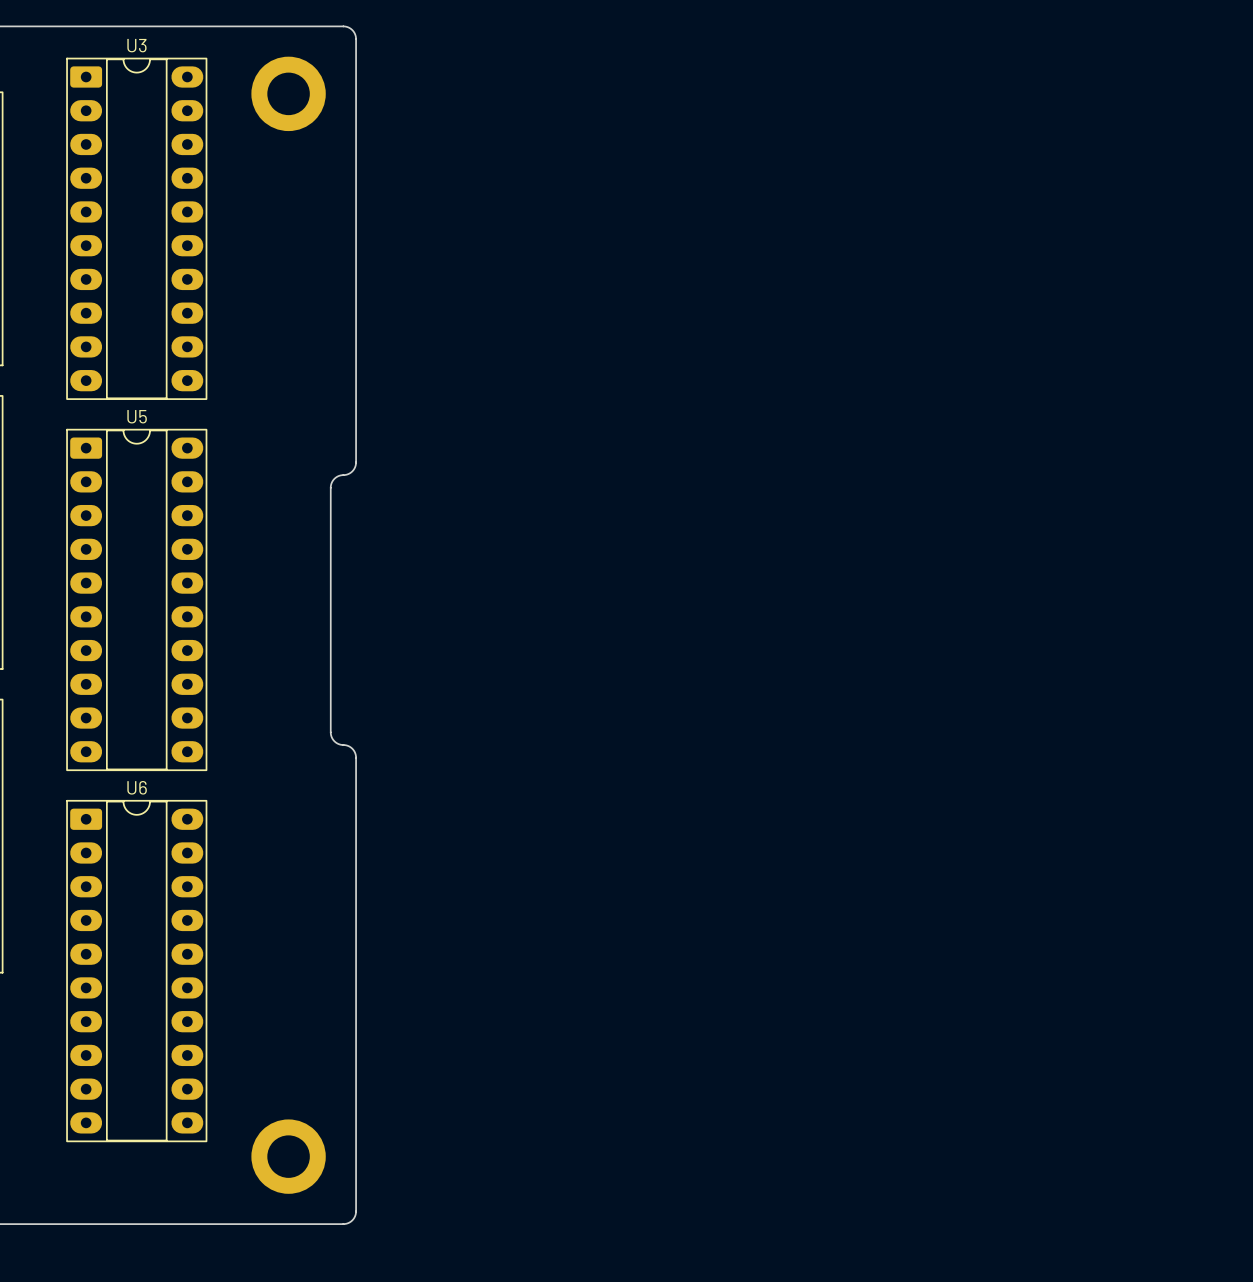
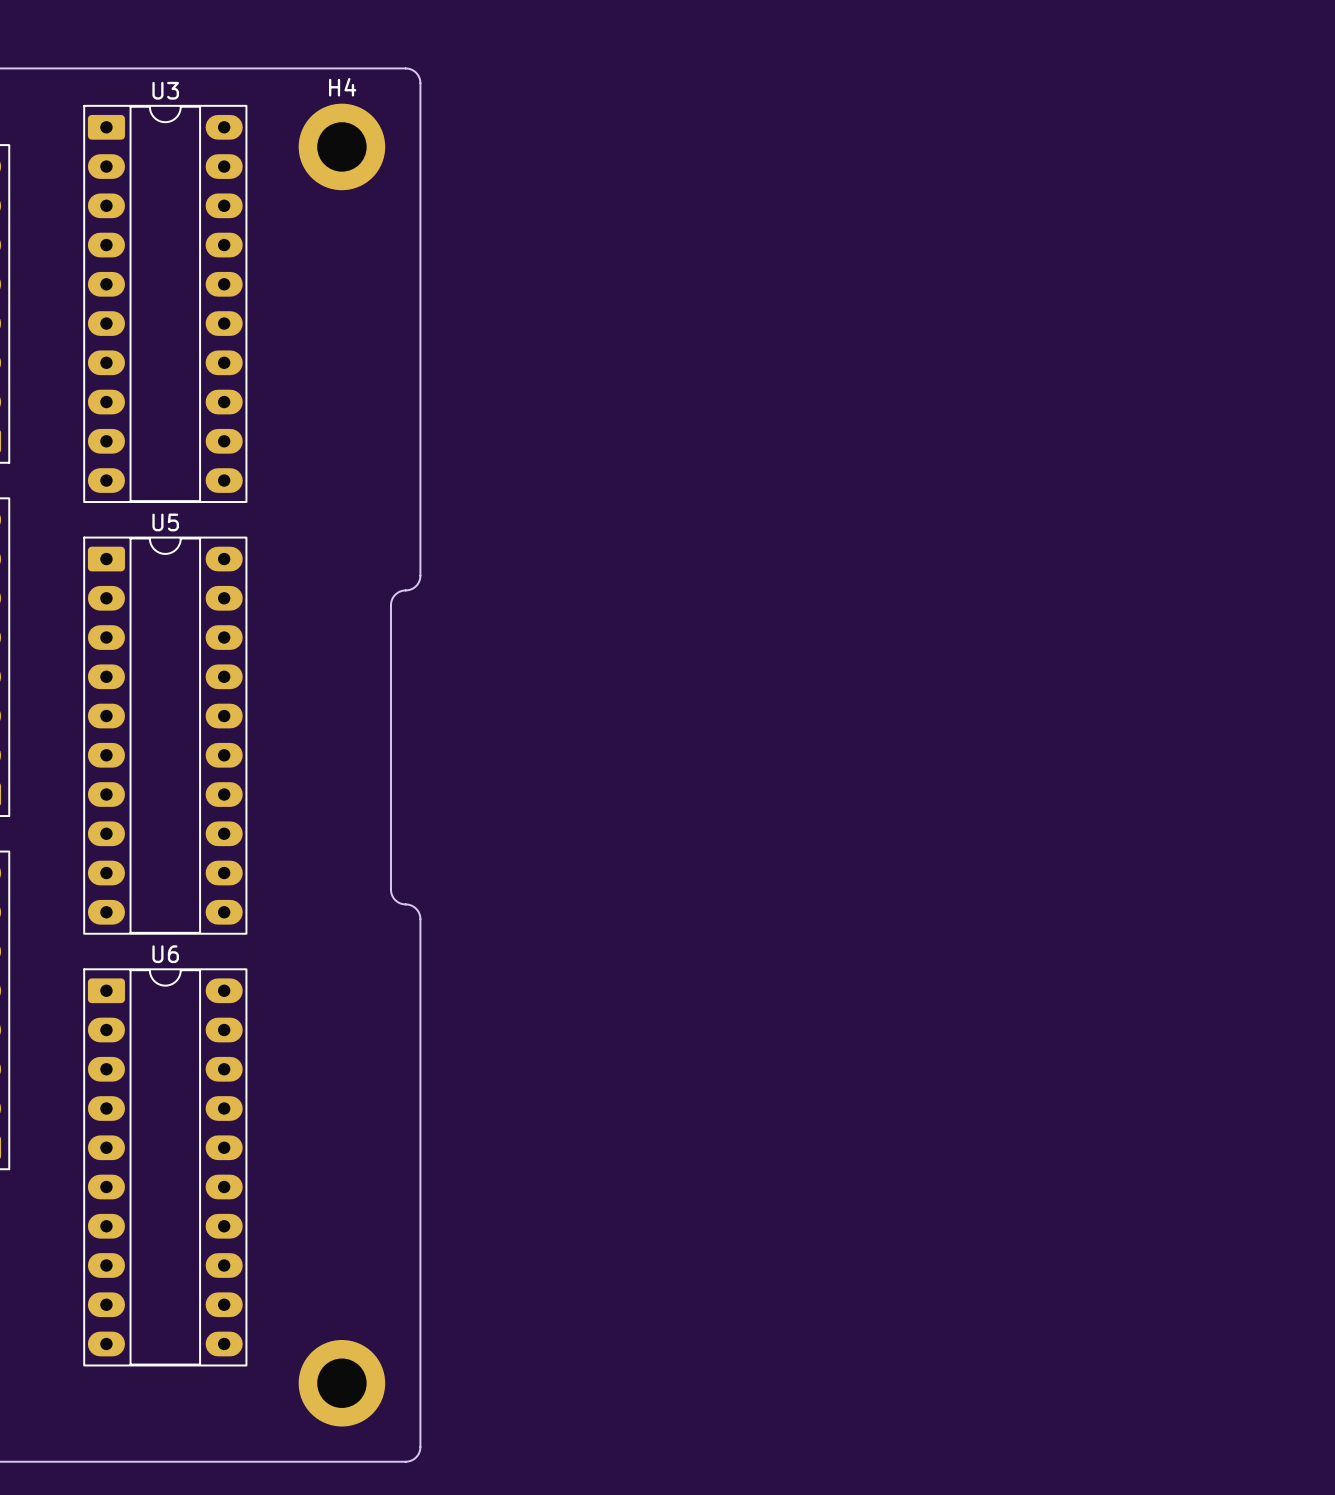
H4 name: none -> H4 (342, 87)

